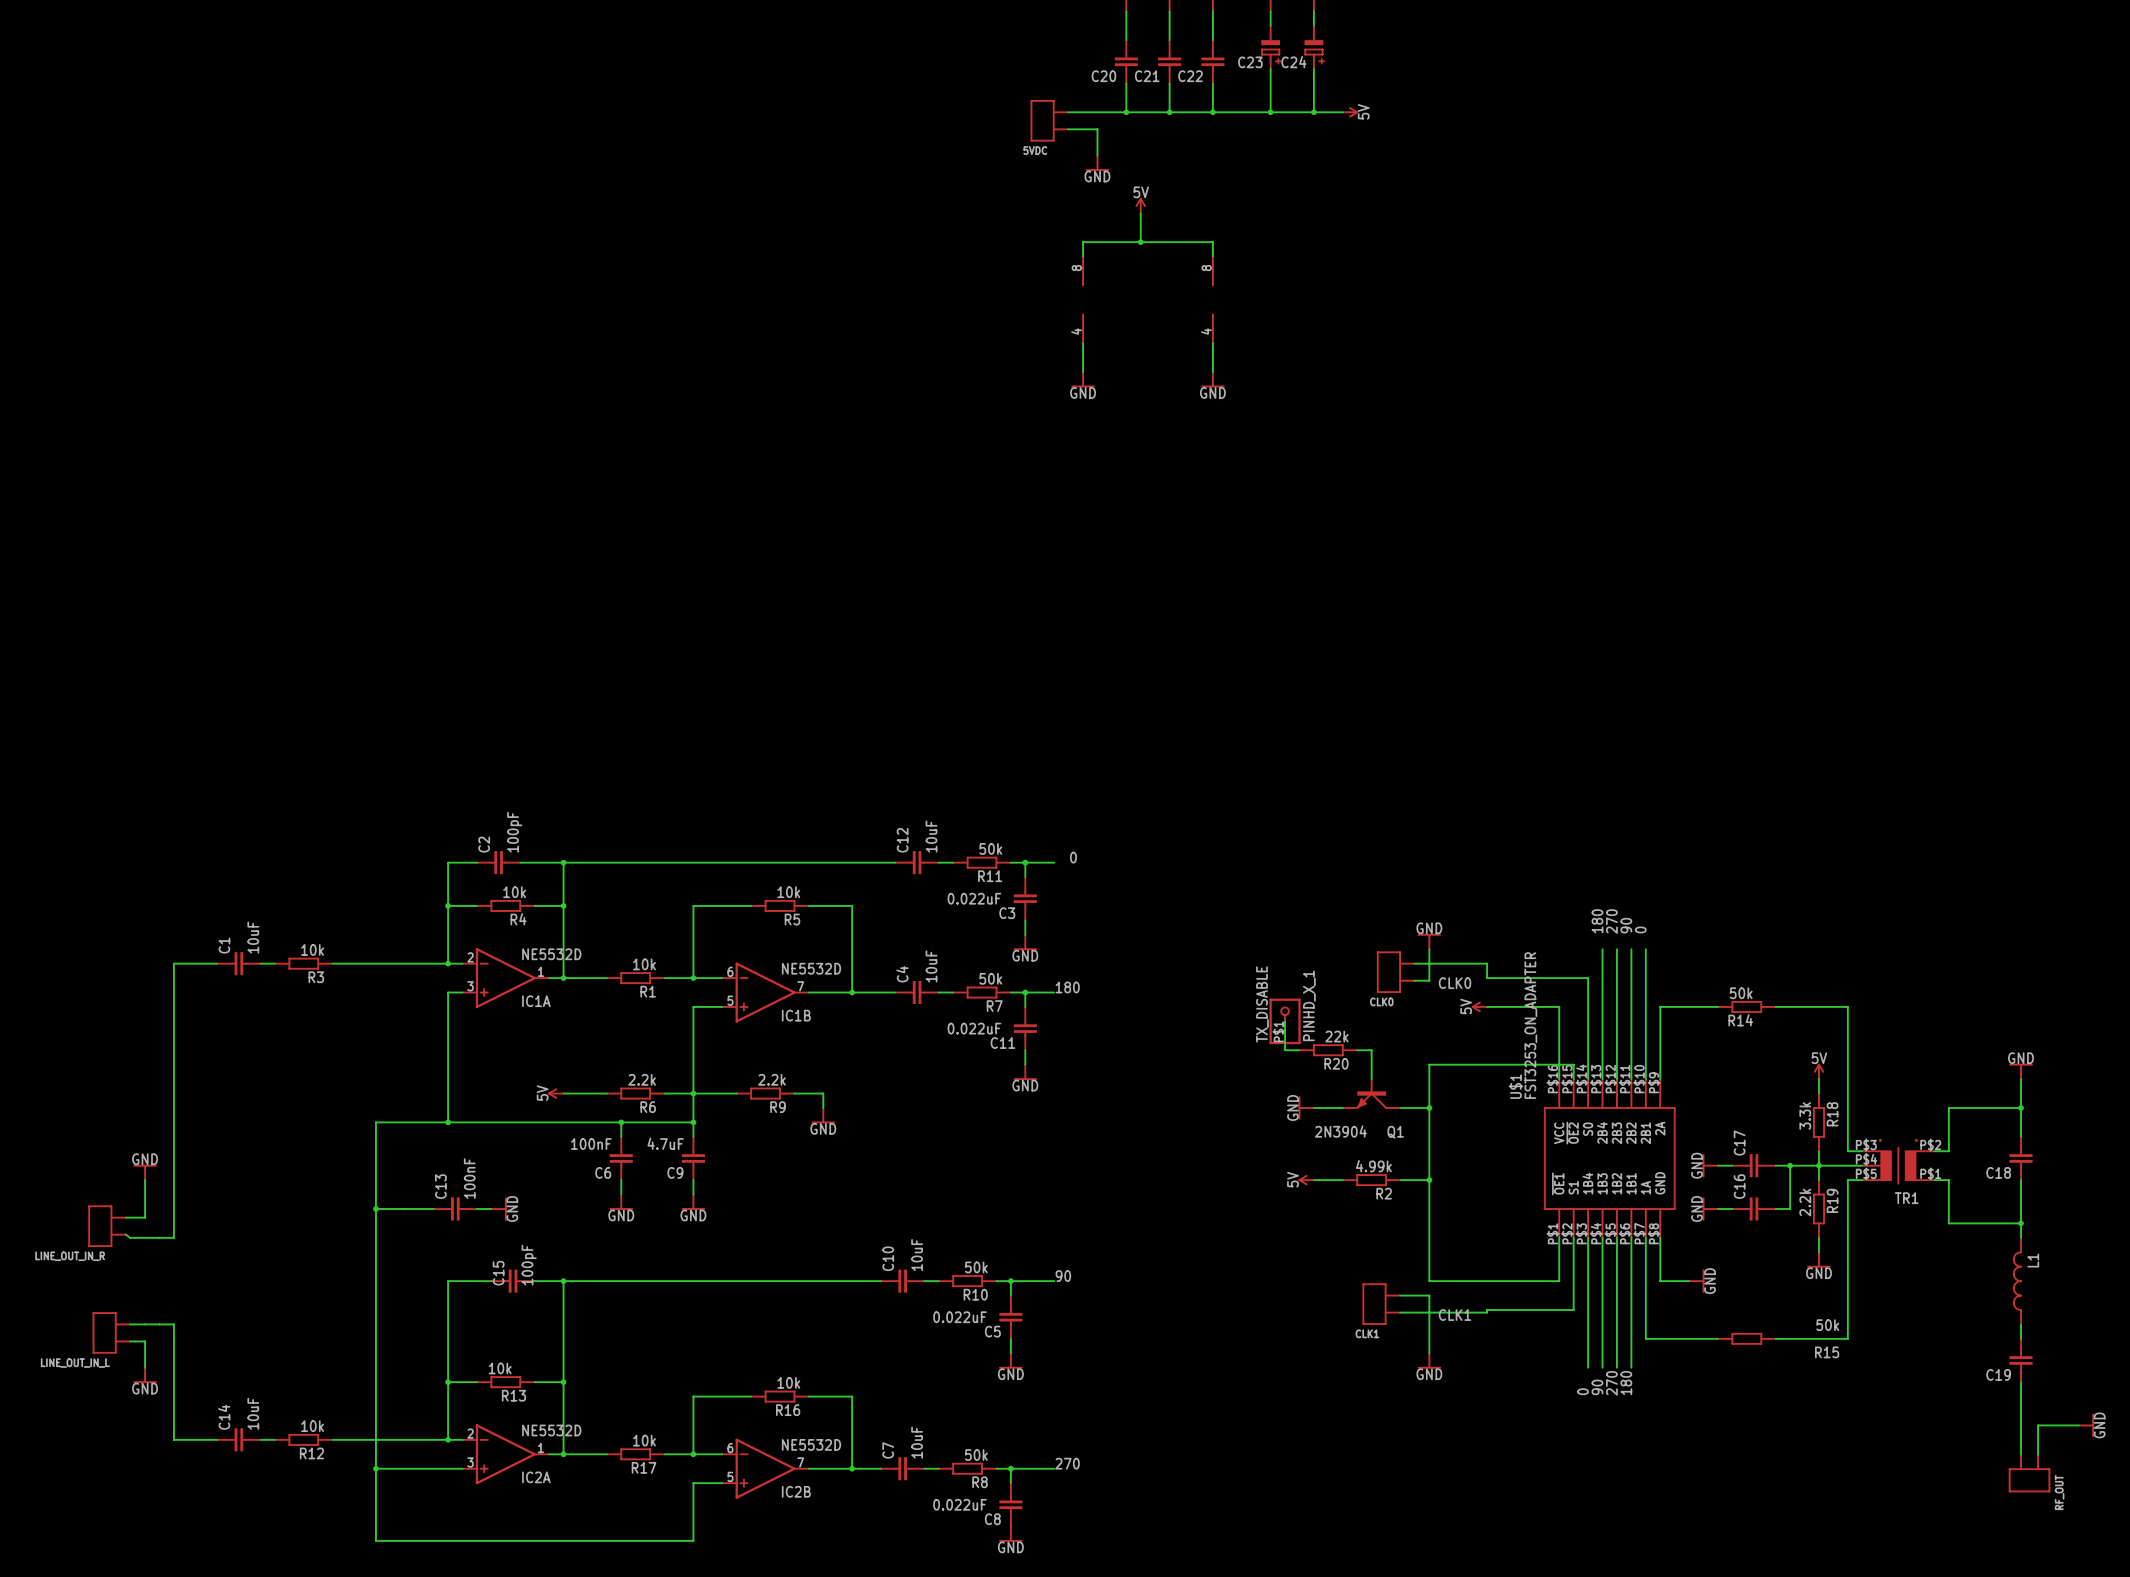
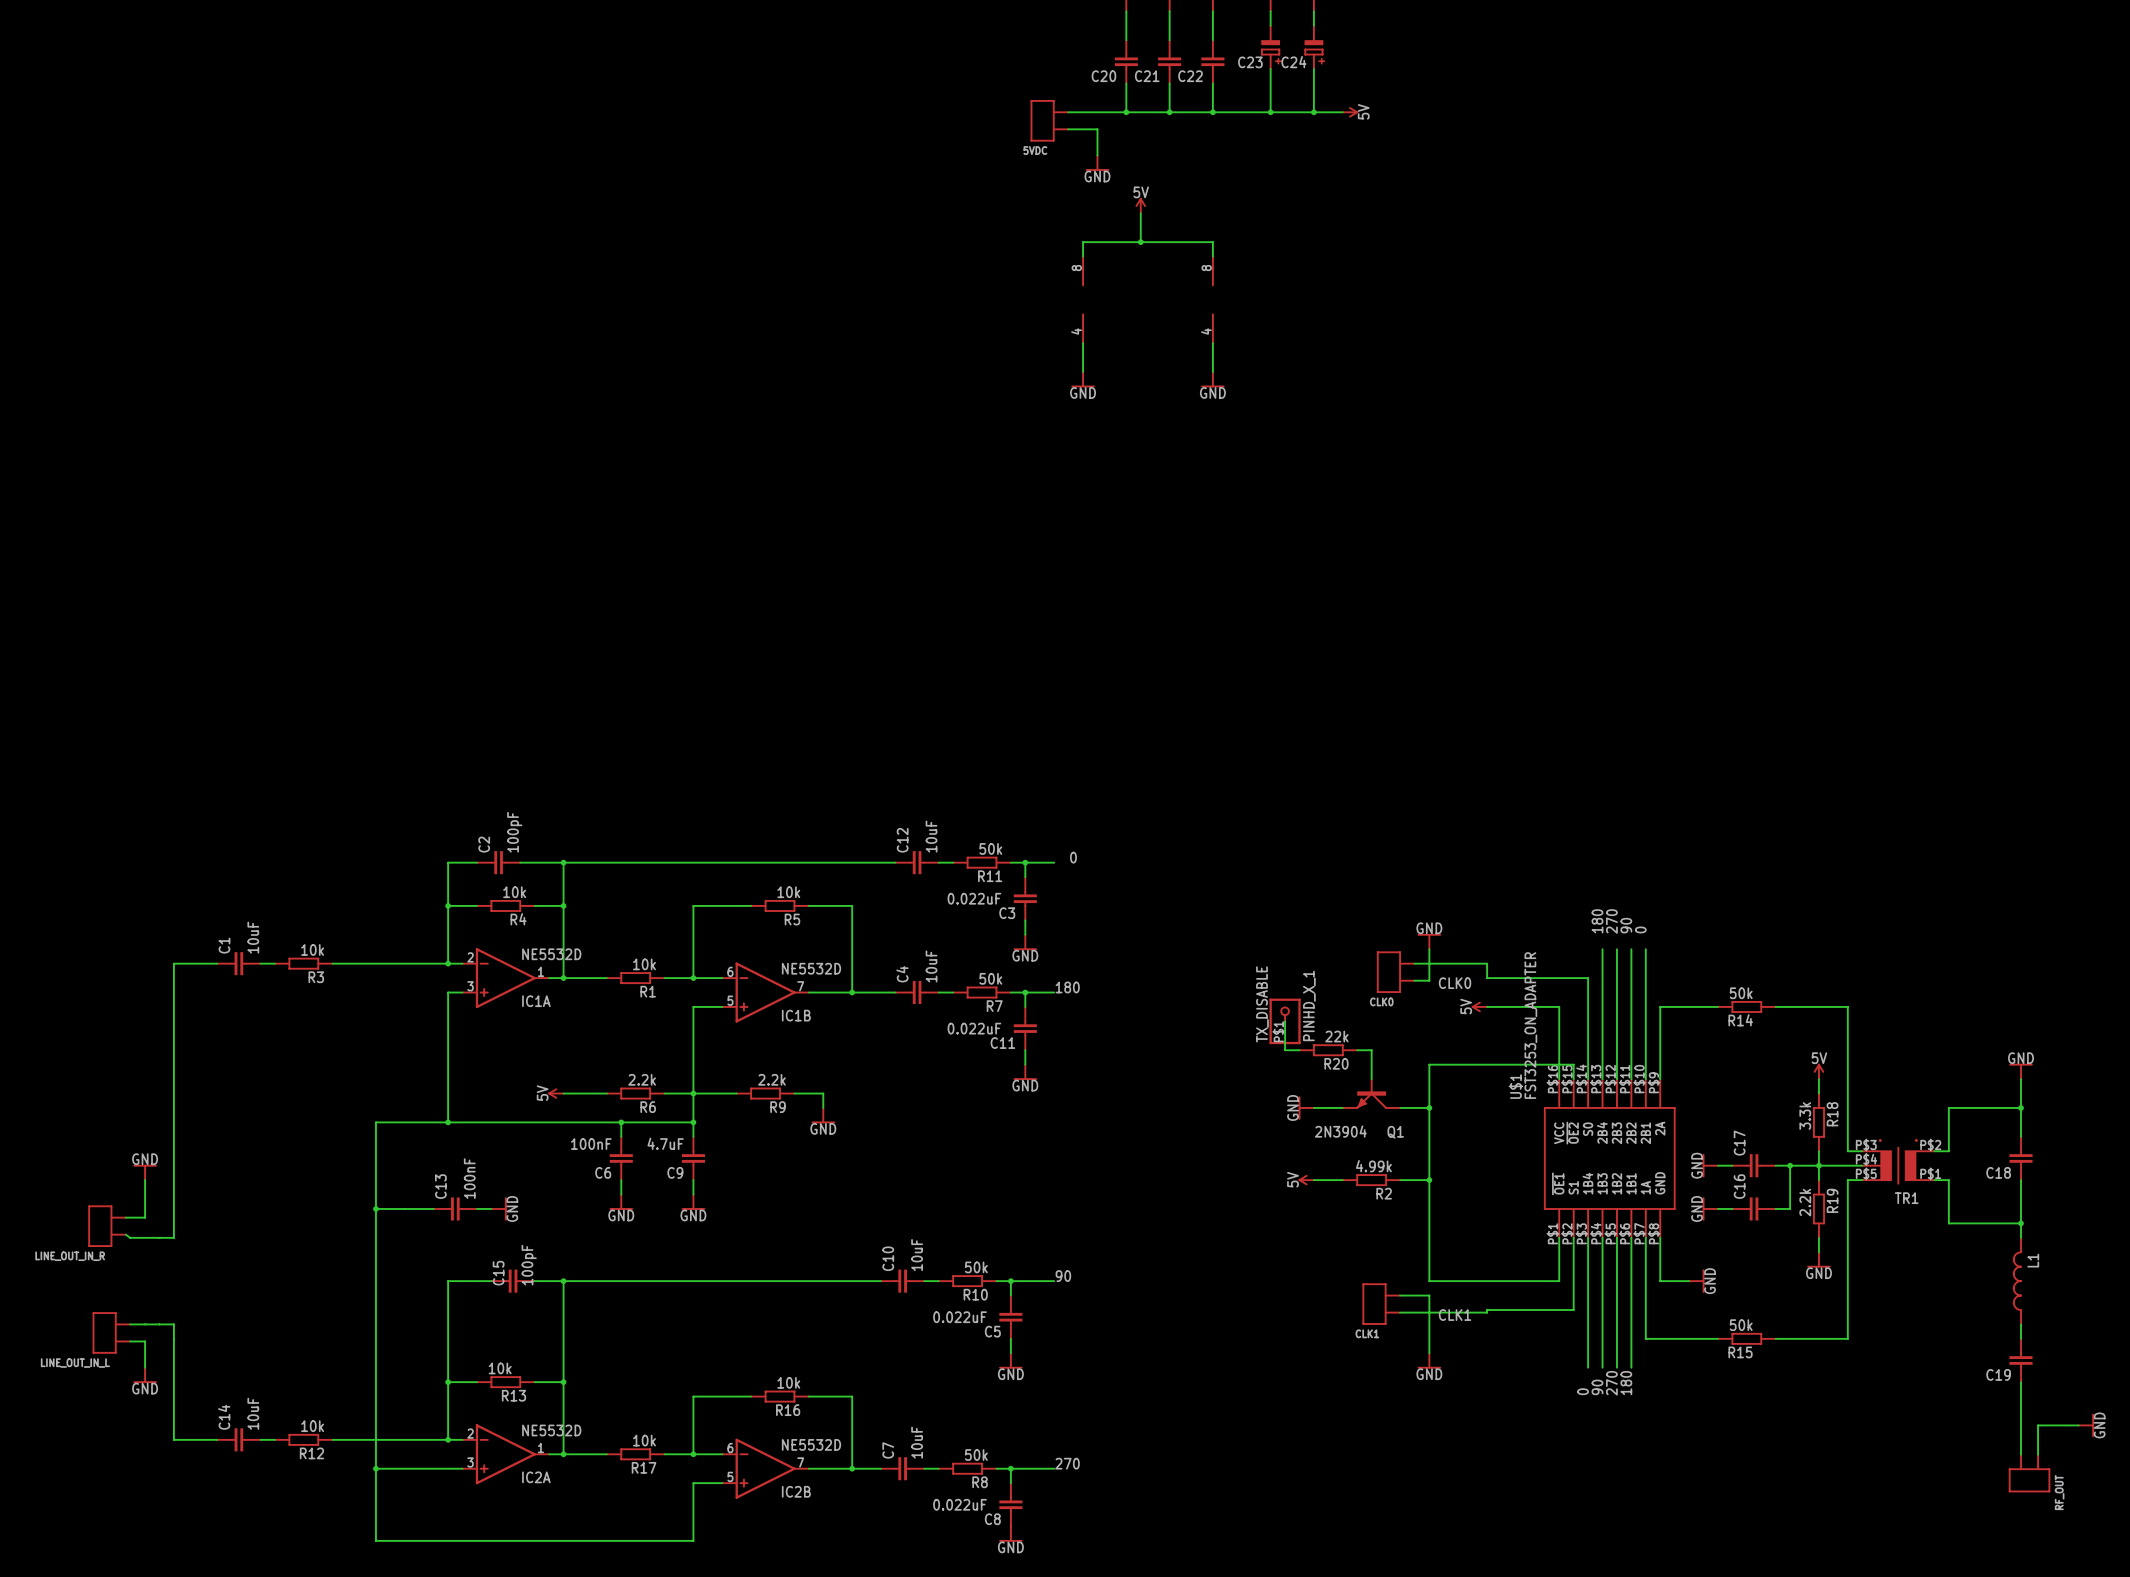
R15 value position: 50k (1827, 1325) -> 50k (1741, 1325)
R15 name position: R15 (1827, 1352) -> R15 (1740, 1352)

